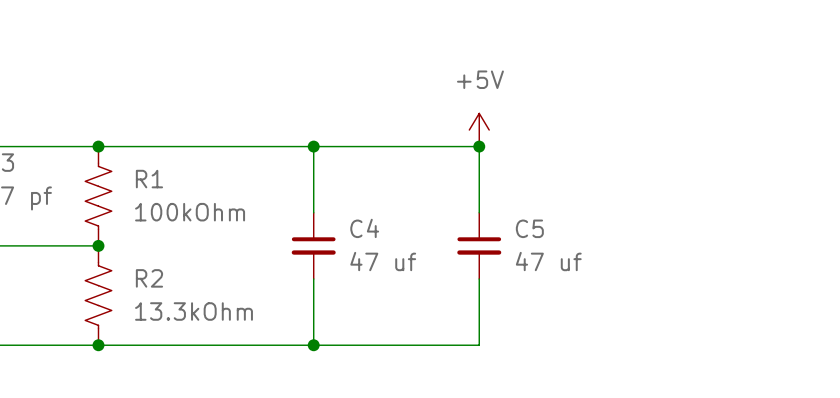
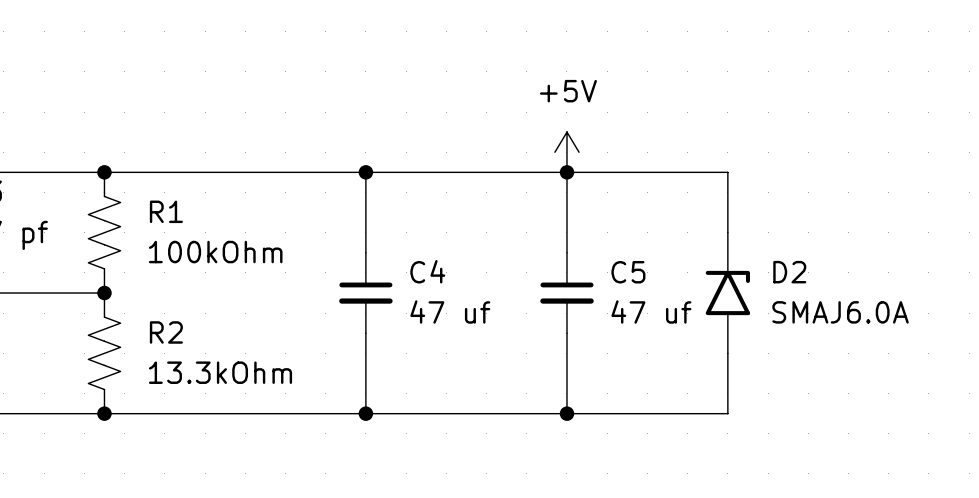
wire: none -> (566, 172) (727, 172) (727, 232)
D2: none -> SMAJ6.0A (727, 293)
wire: none -> (727, 353) (727, 413) (566, 413)
junction: none -> (566, 413)

